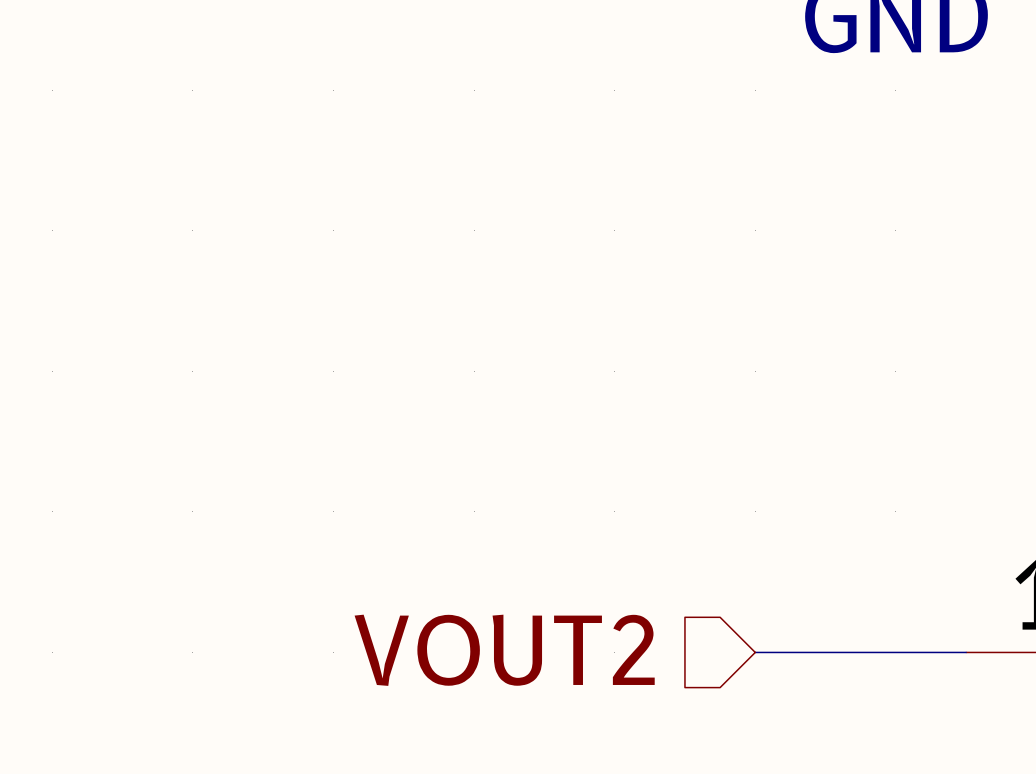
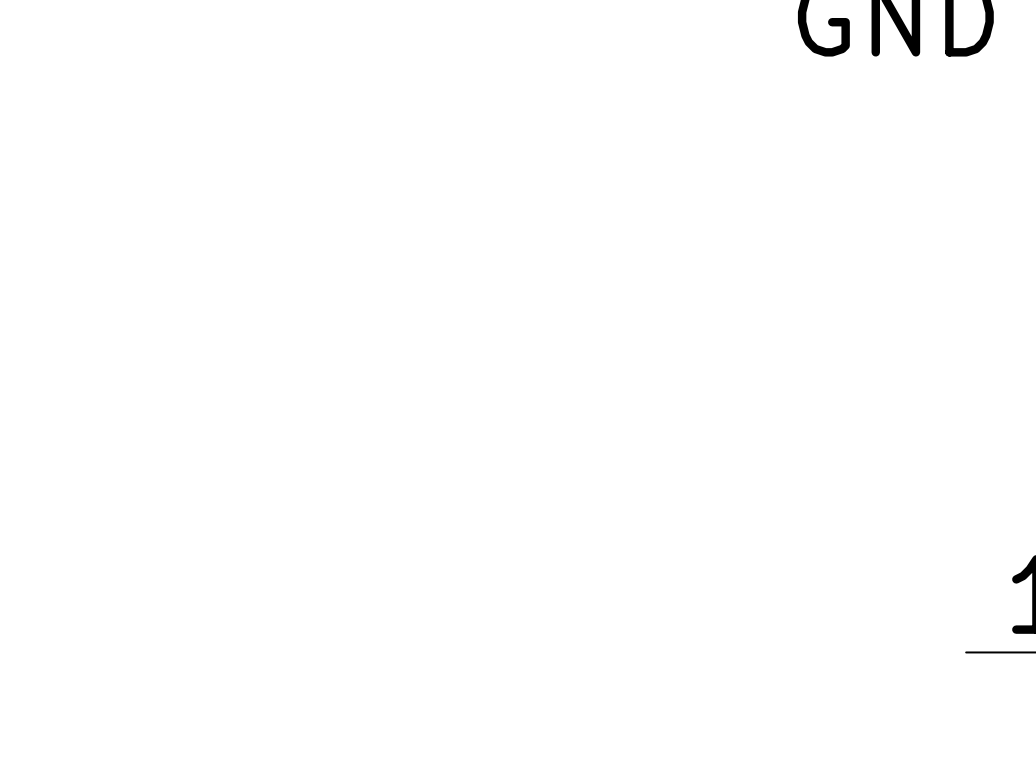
hierarchical label: VOUT2 (504, 650) -> none
wire: (755, 652) (966, 652) -> none

